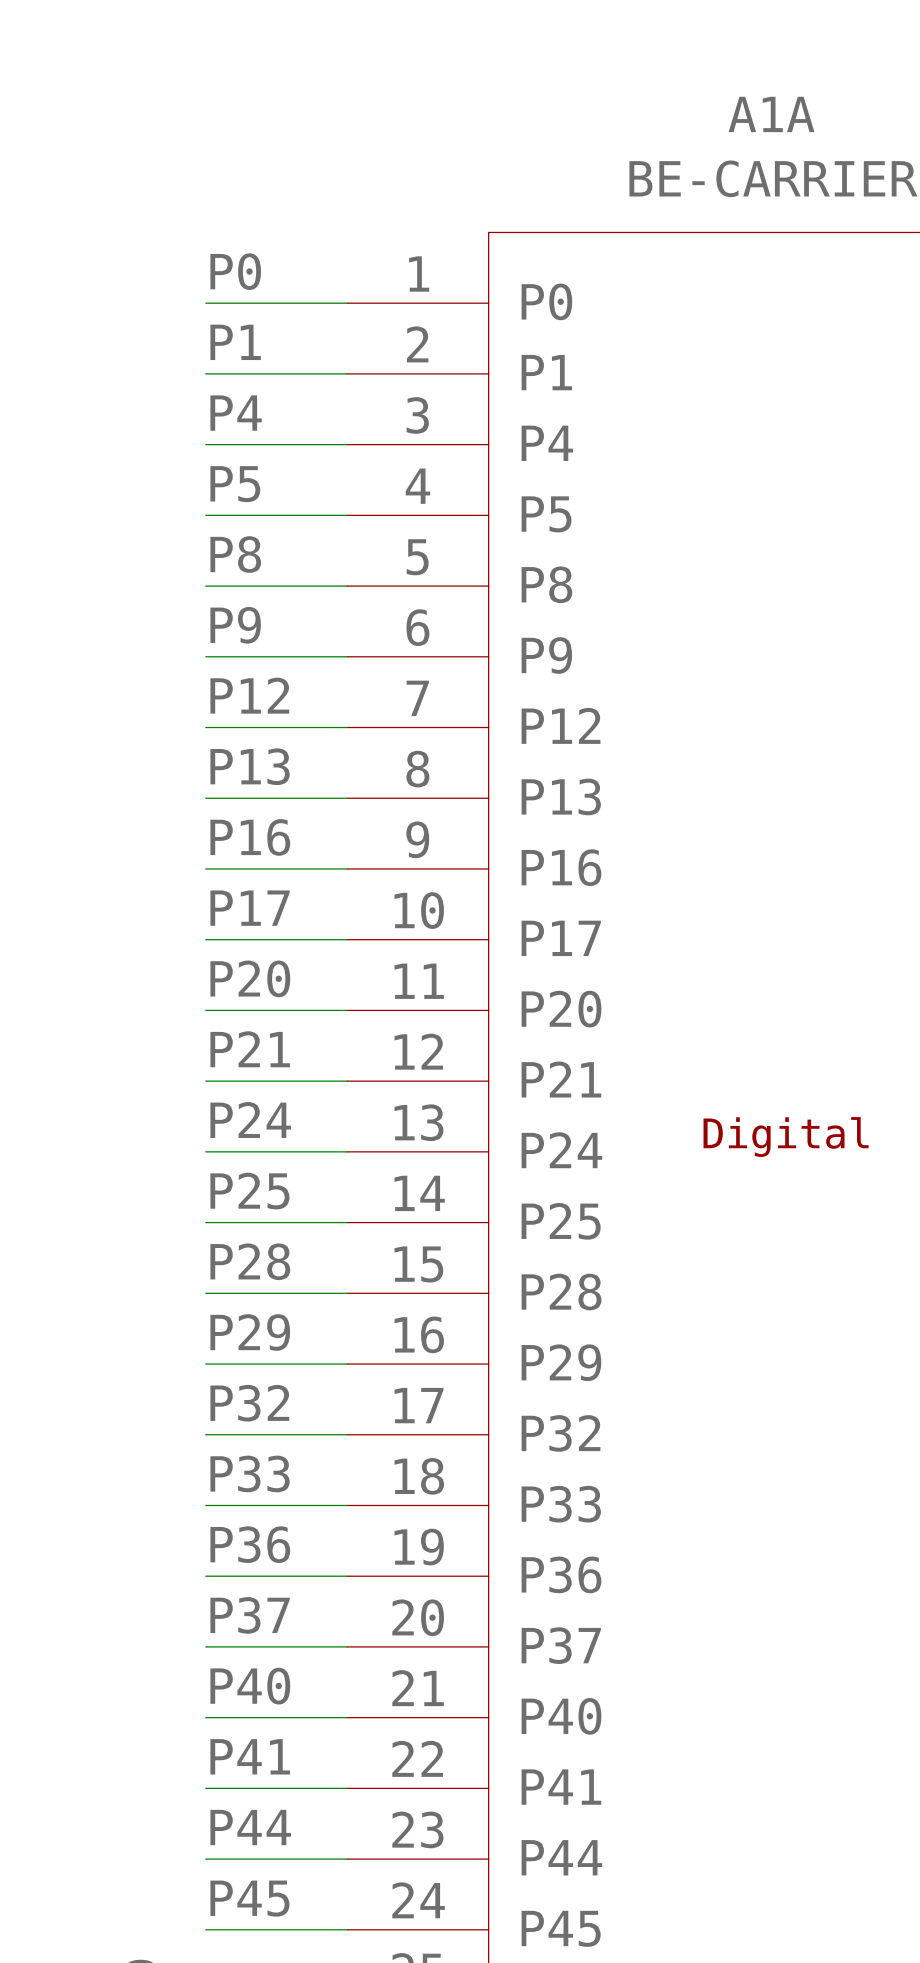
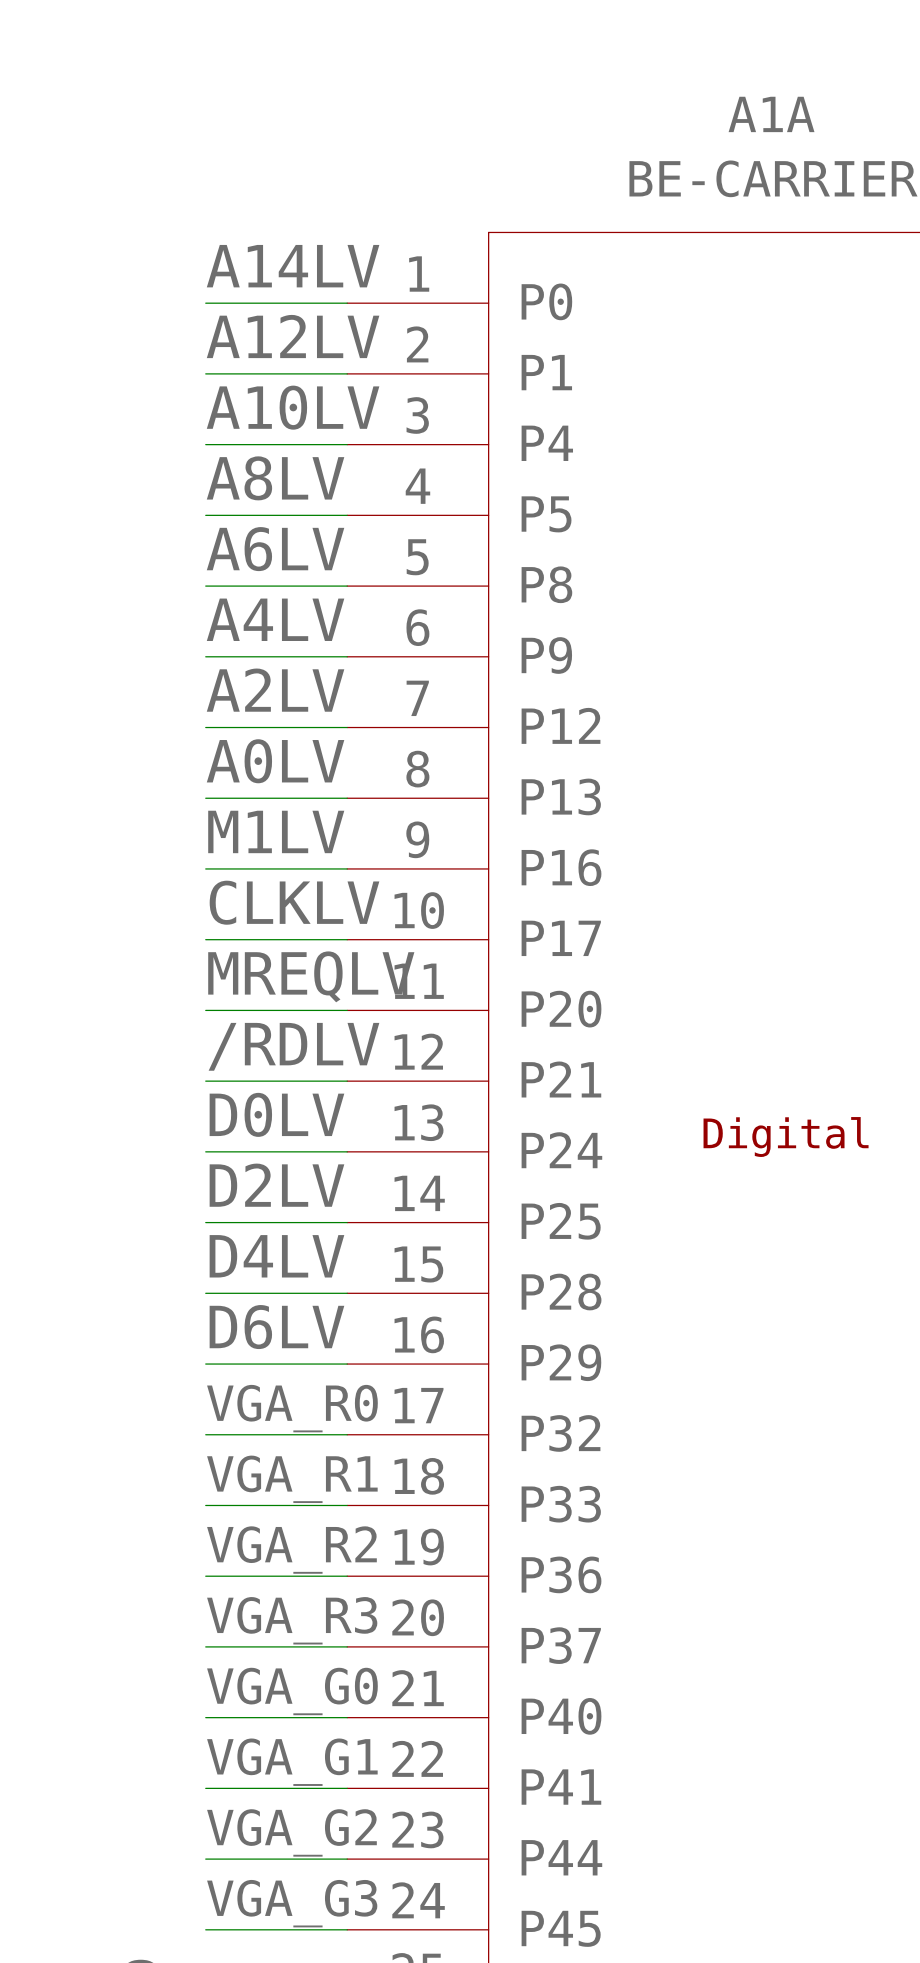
label: P0 (235, 271) -> A14LV (293, 266)
label: P1 (235, 342) -> A12LV (293, 336)
label: P4 (236, 413) -> A10LV (293, 407)
label: P5 (235, 484) -> A8LV (275, 478)
label: P8 (235, 554) -> A6LV (275, 549)
label: P9 (235, 625) -> A4LV (275, 619)
label: P12 (249, 695) -> A2LV (275, 690)
label: P13 (250, 766) -> A0LV (275, 761)
label: P16 (250, 837) -> M1LV (276, 831)
label: P17 (250, 908) -> CLKLV (294, 902)
label: P20 (250, 978) -> MREQLV (311, 976)
label: P21 (250, 1049) -> /RDLV (293, 1046)
label: P24 (250, 1119) -> D0LV (276, 1114)
label: P25 (249, 1191) -> D2LV (276, 1185)
label: P28 (250, 1261) -> D4LV (276, 1256)
label: P29 (250, 1332) -> D6LV (276, 1327)
label: P32 (249, 1403) -> VGA_R0 (292, 1408)
label: P33 (250, 1473) -> VGA_R1 (292, 1479)
label: P36 (250, 1544) -> VGA_R2 (291, 1550)
label: P37 (250, 1615) -> VGA_R3 (292, 1620)
label: P40 (250, 1686) -> VGA_G0 (292, 1691)
label: P41 (250, 1756) -> VGA_G1 (292, 1762)
label: P44 (250, 1827) -> VGA_G2 (291, 1832)
label: P45 (249, 1898) -> VGA_G3 (292, 1903)

